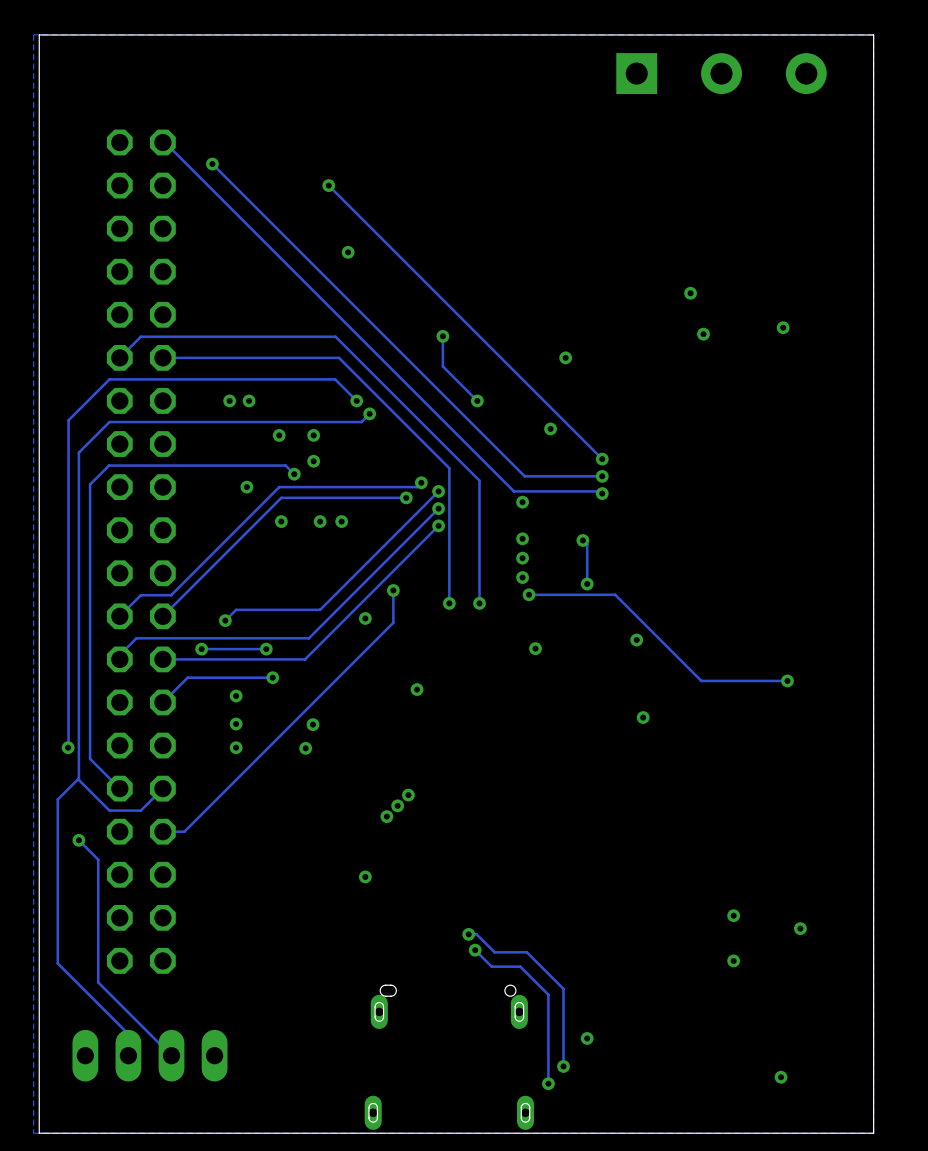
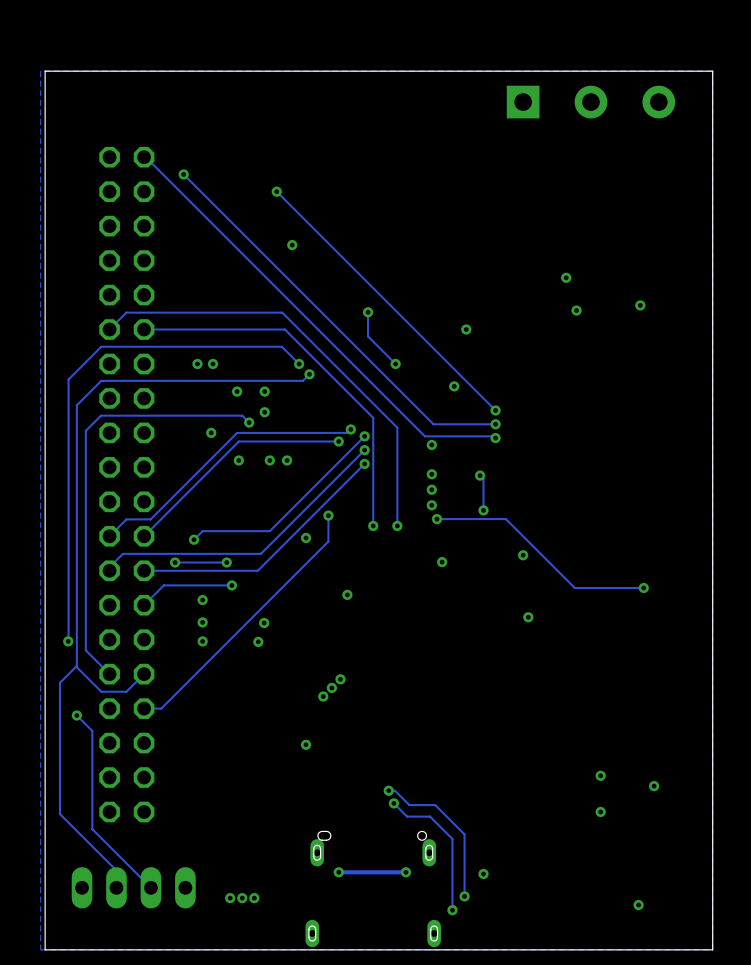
via: none -> (338, 872)
track: none -> (405, 872) (338, 872)
via: none -> (405, 872)
via: none -> (230, 898)
via: none -> (242, 898)
via: none -> (254, 898)

